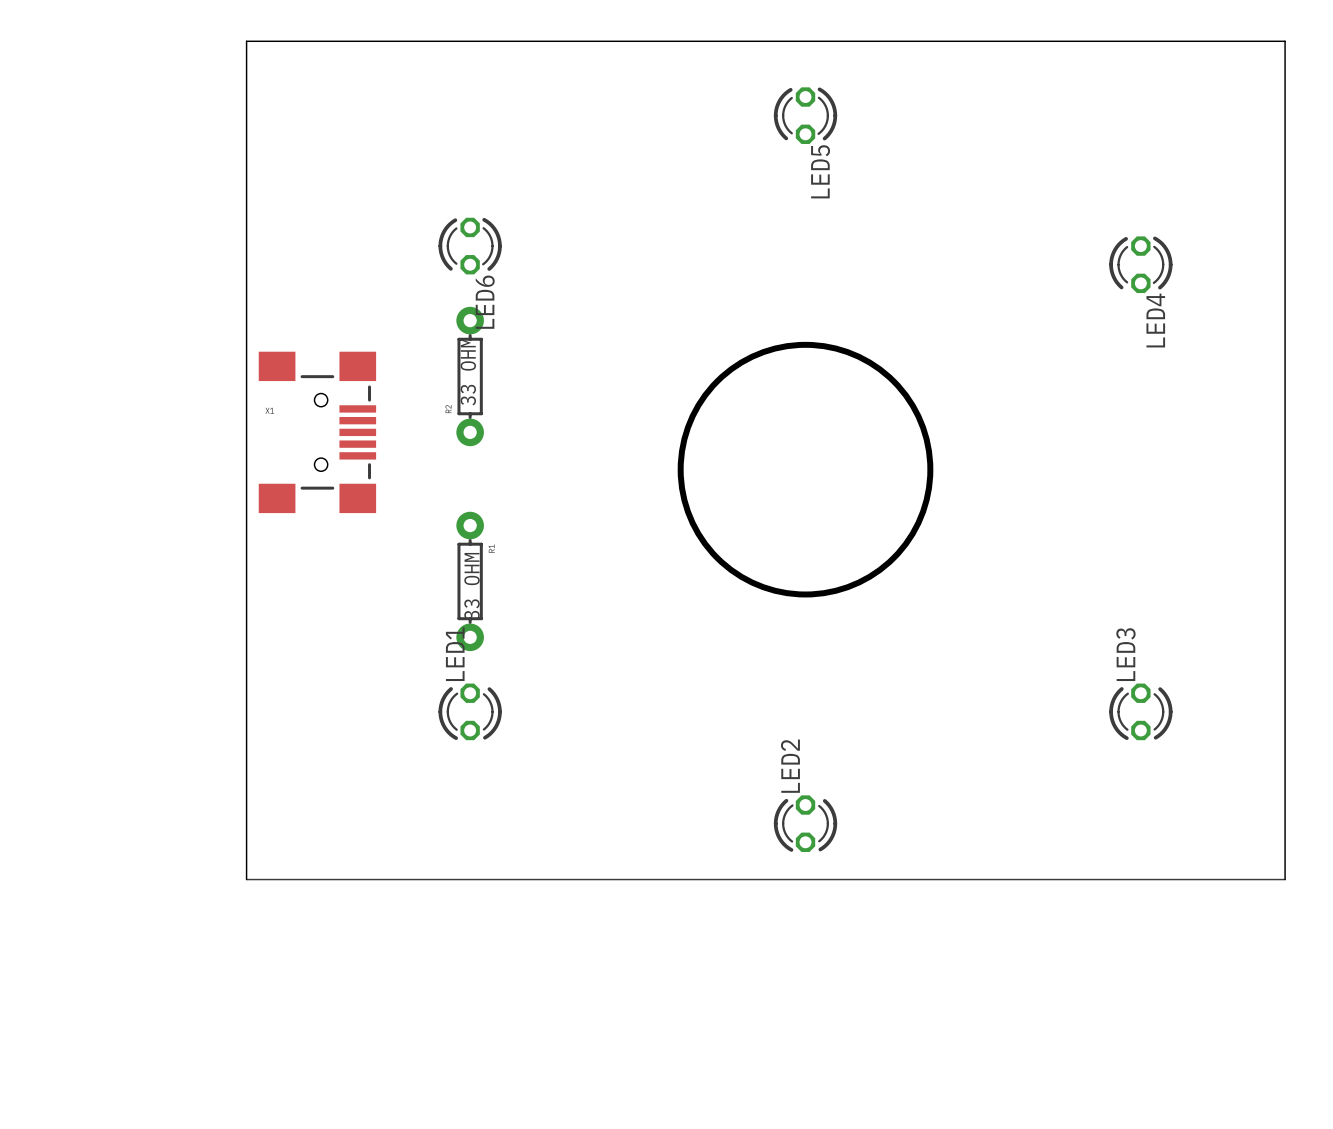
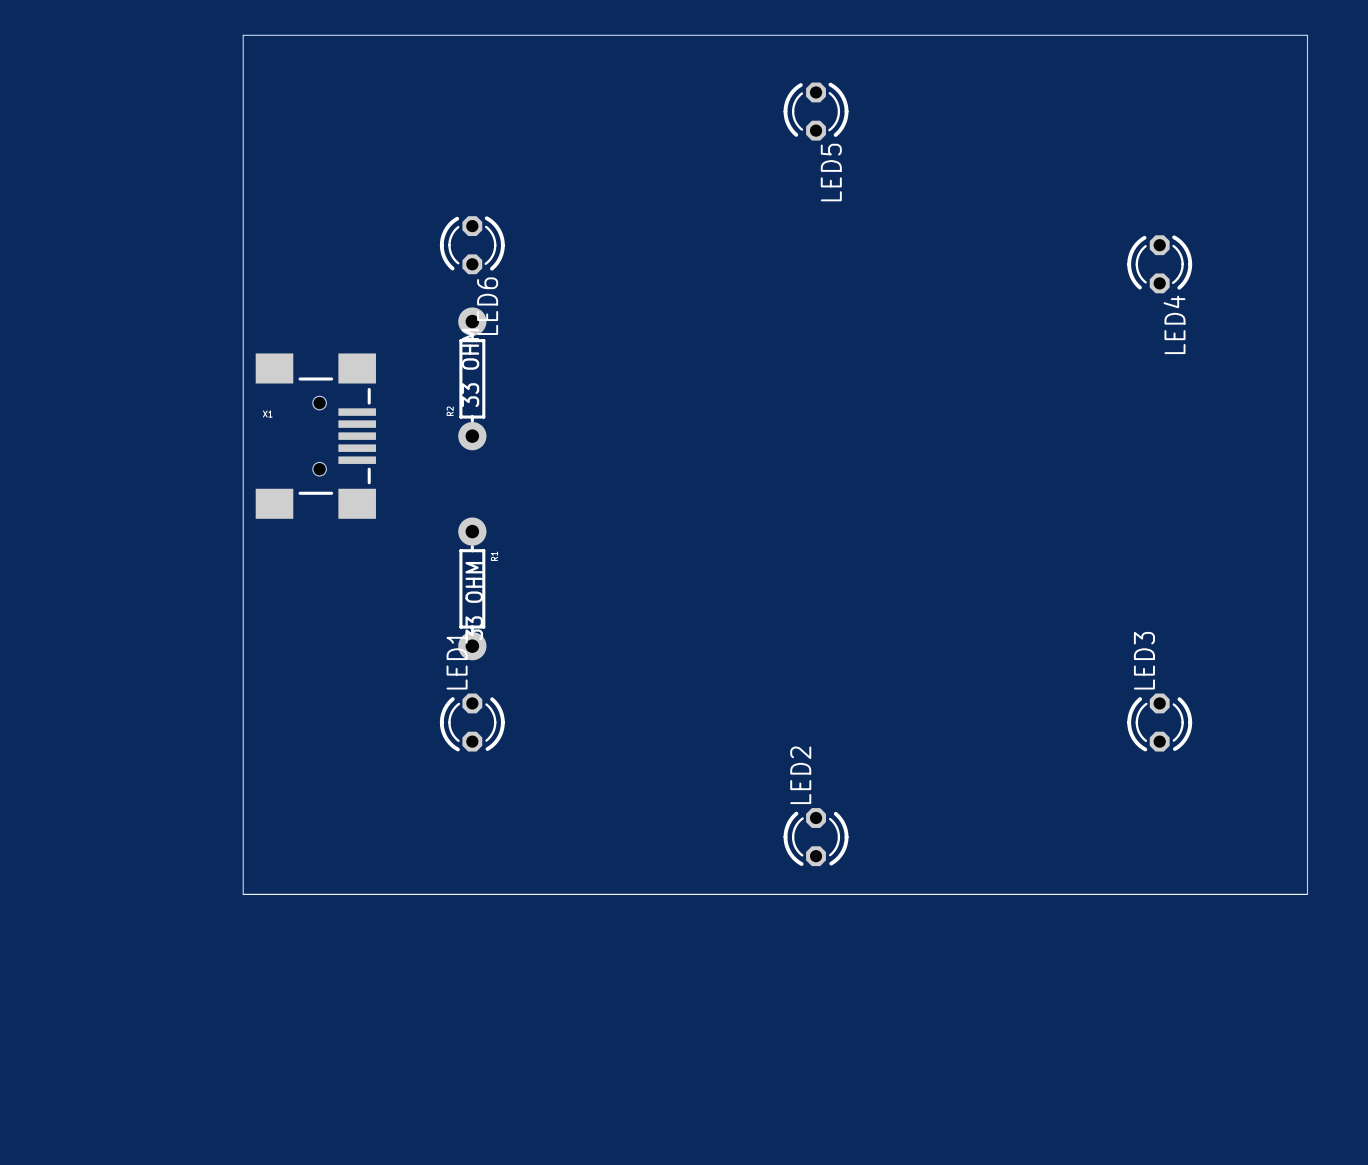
round board edge: [677, 341, 934, 598] -> none

